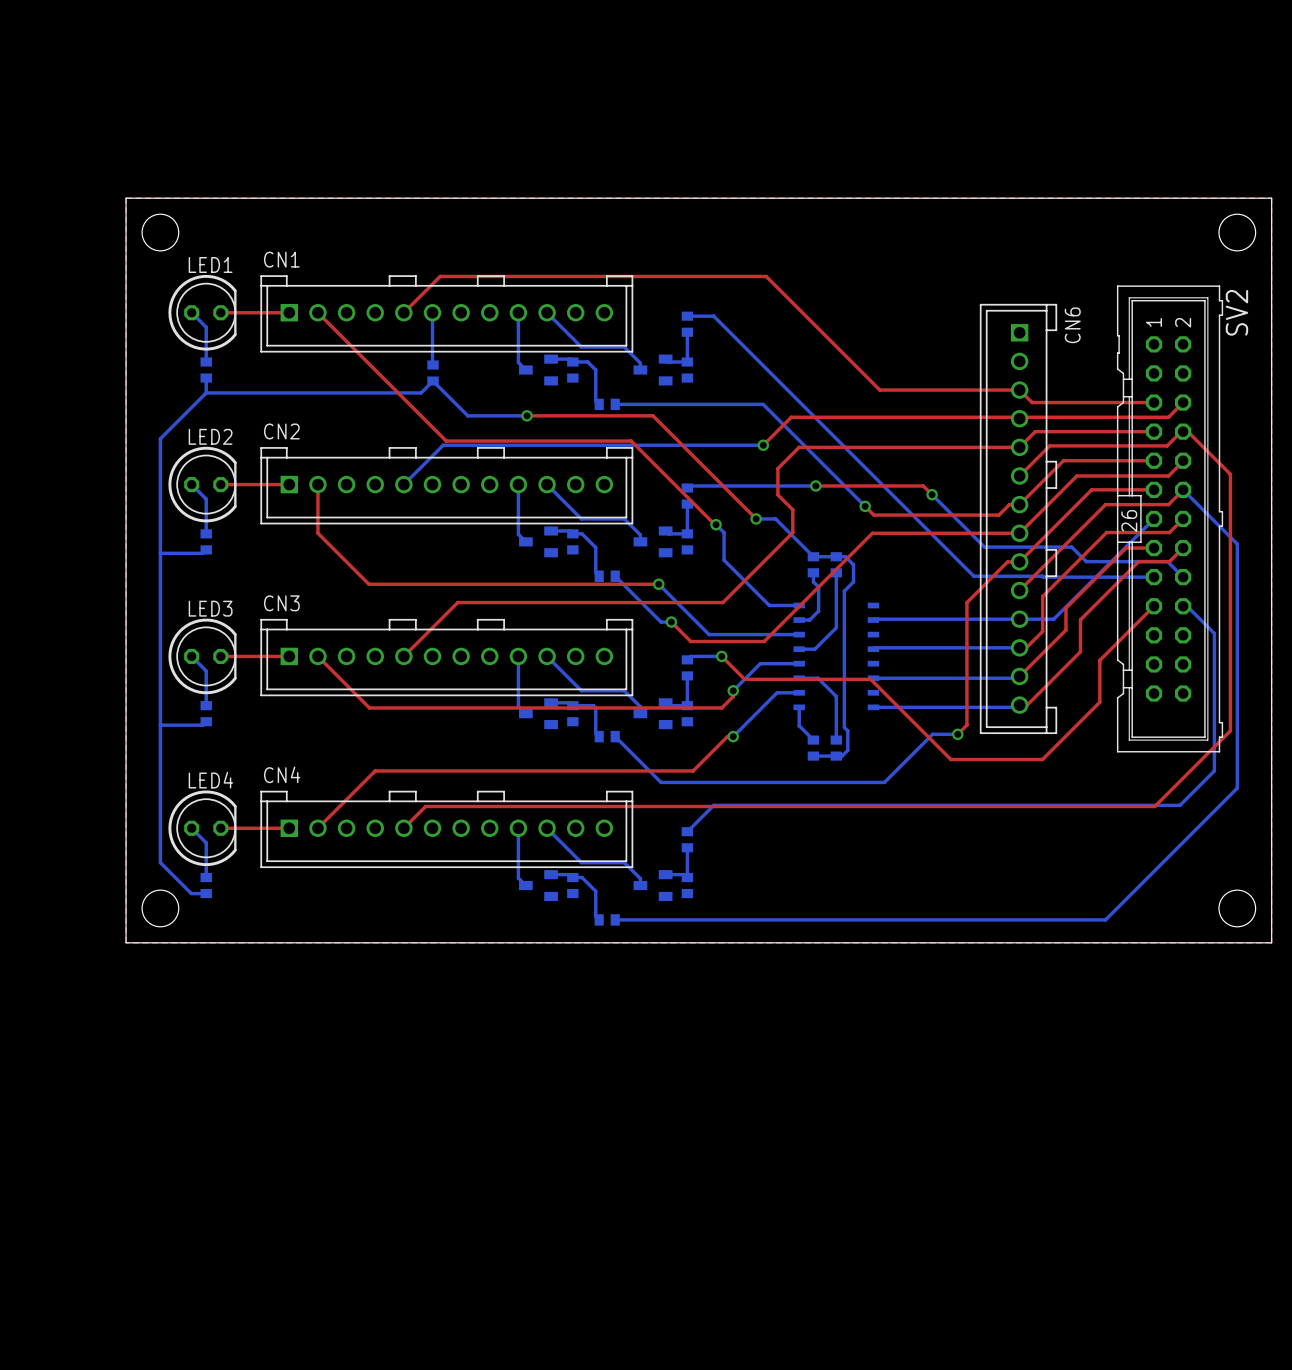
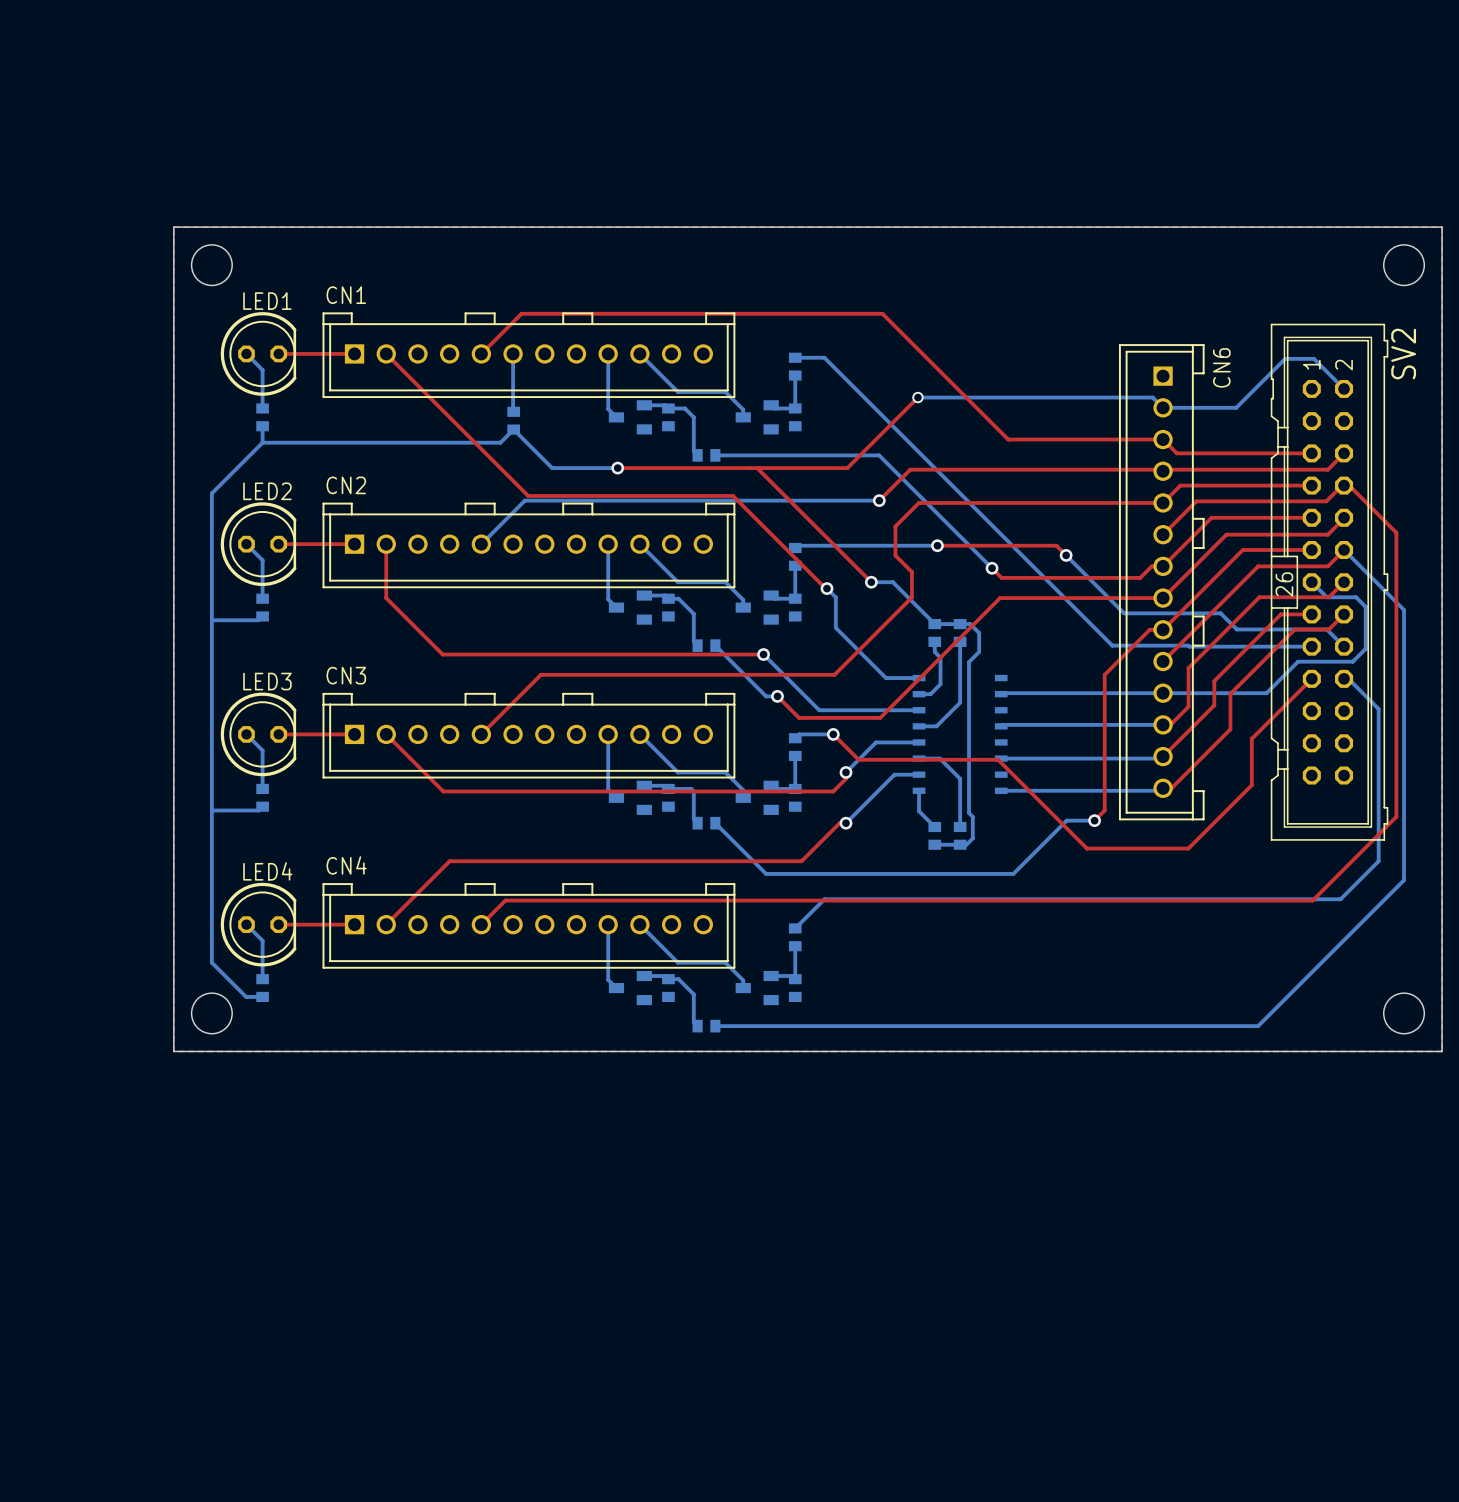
bottom track: none -> (1344, 388) (1313, 358) (1285, 358) (1236, 407) (1163, 407) (1152, 397) (917, 397)
top track: none -> (917, 397) (847, 468) (757, 468)
via: none -> (917, 397)
bottom track: (1154, 518) (1053, 619) -> (1311, 582) (1326, 597) (1356, 597) (1365, 606) (1365, 648) (1352, 661) (1298, 661) (1266, 693) (1200, 693)

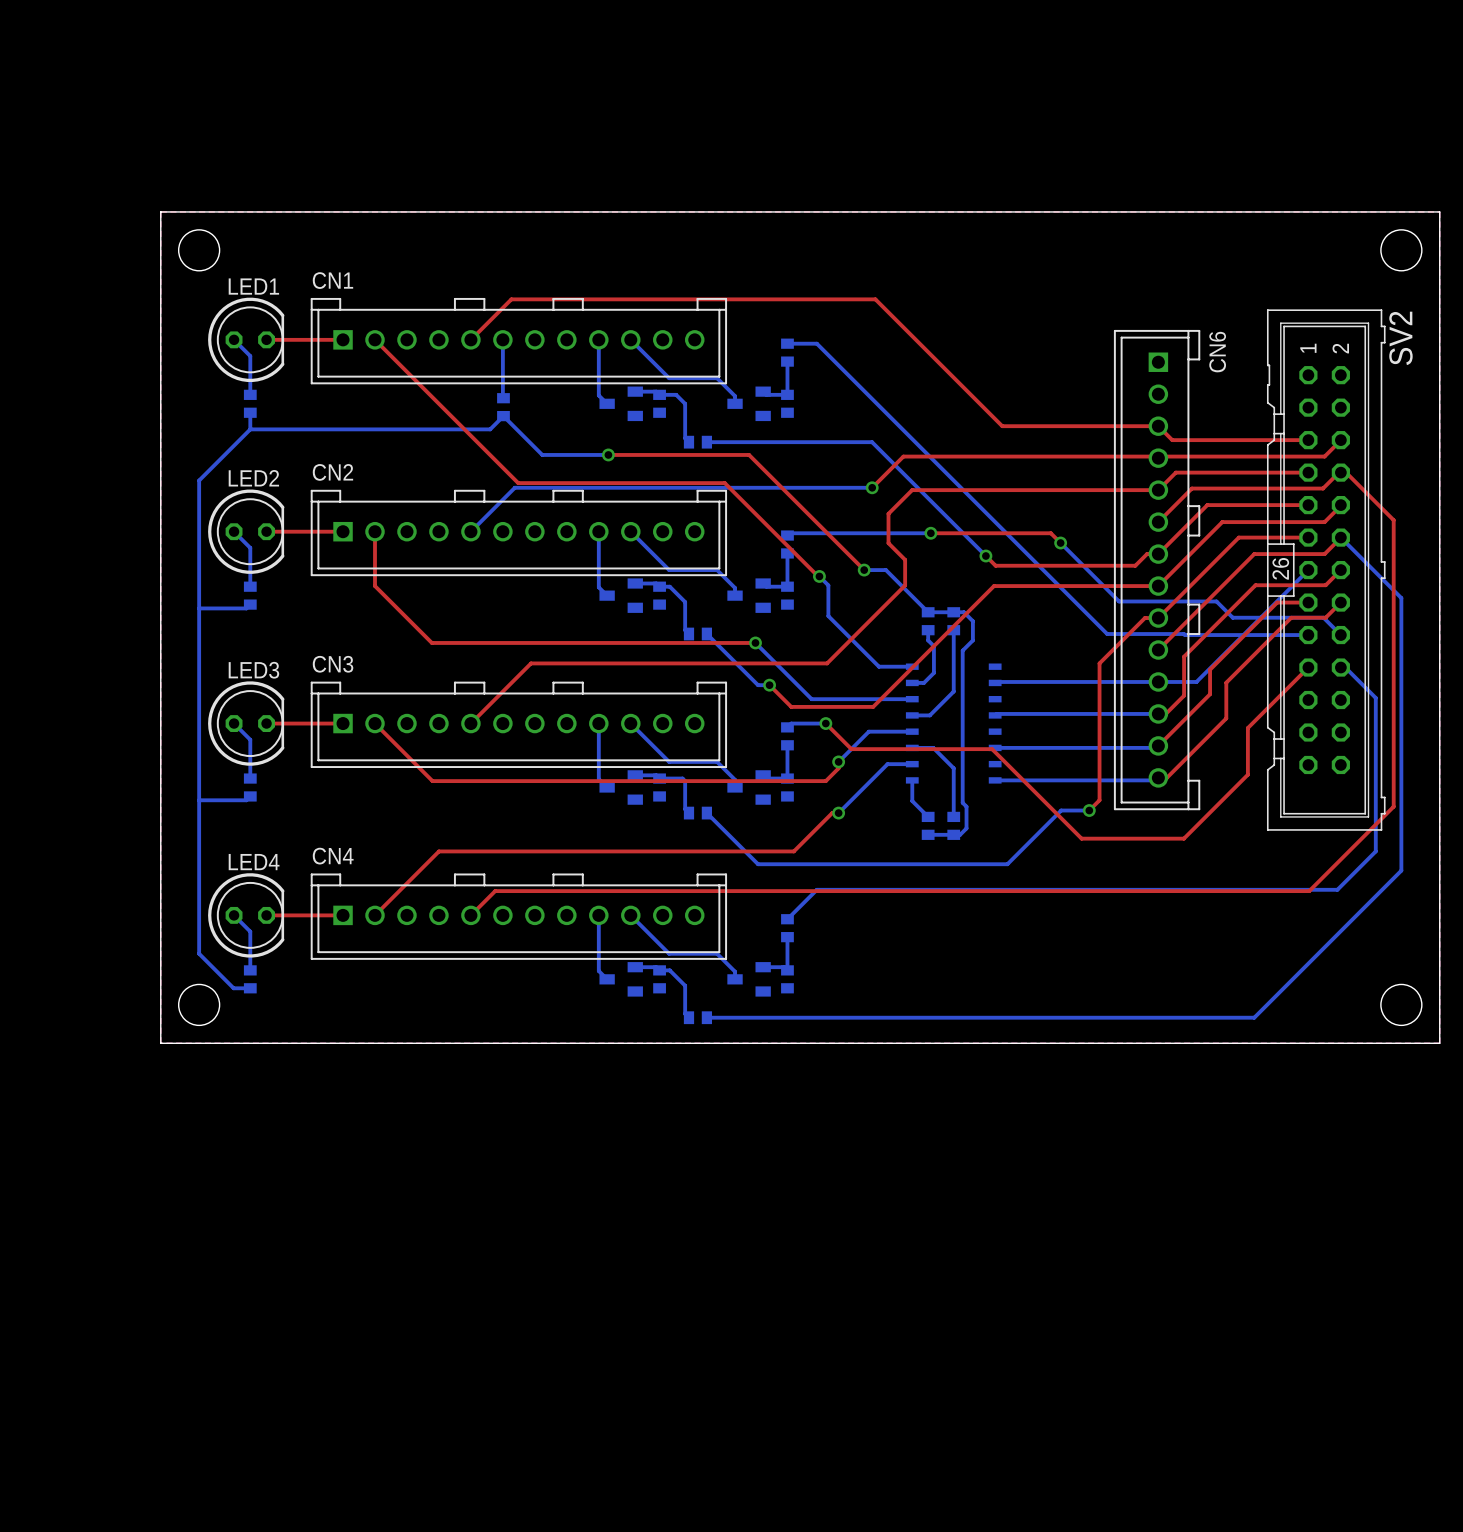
bottom track: (1344, 388) (1313, 358) (1285, 358) (1236, 407) (1163, 407) (1152, 397) (917, 397) -> none
top track: (917, 397) (847, 468) (757, 468) -> none
via: (917, 397) -> none
bottom track: (1311, 582) (1326, 597) (1356, 597) (1365, 606) (1365, 648) (1352, 661) (1298, 661) (1266, 693) (1200, 693) -> (1308, 570) (1196, 681)

